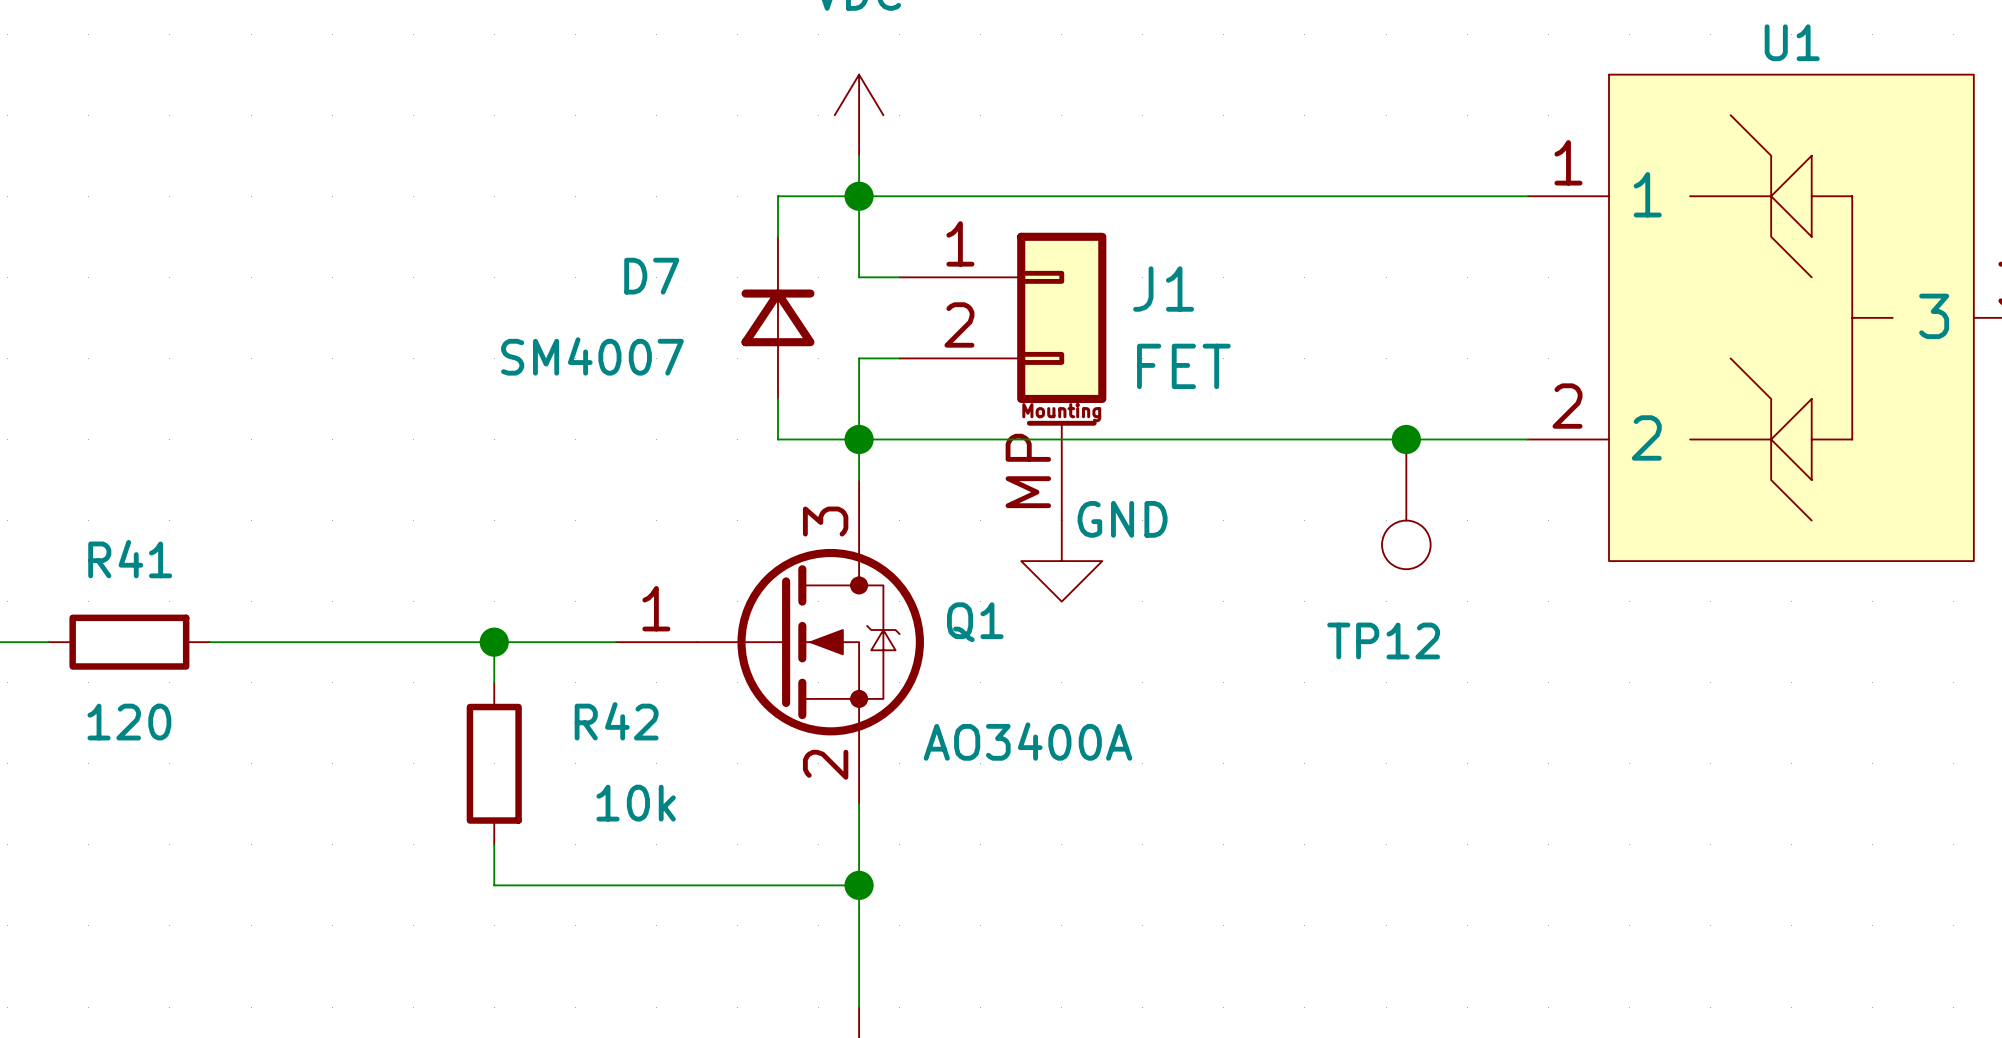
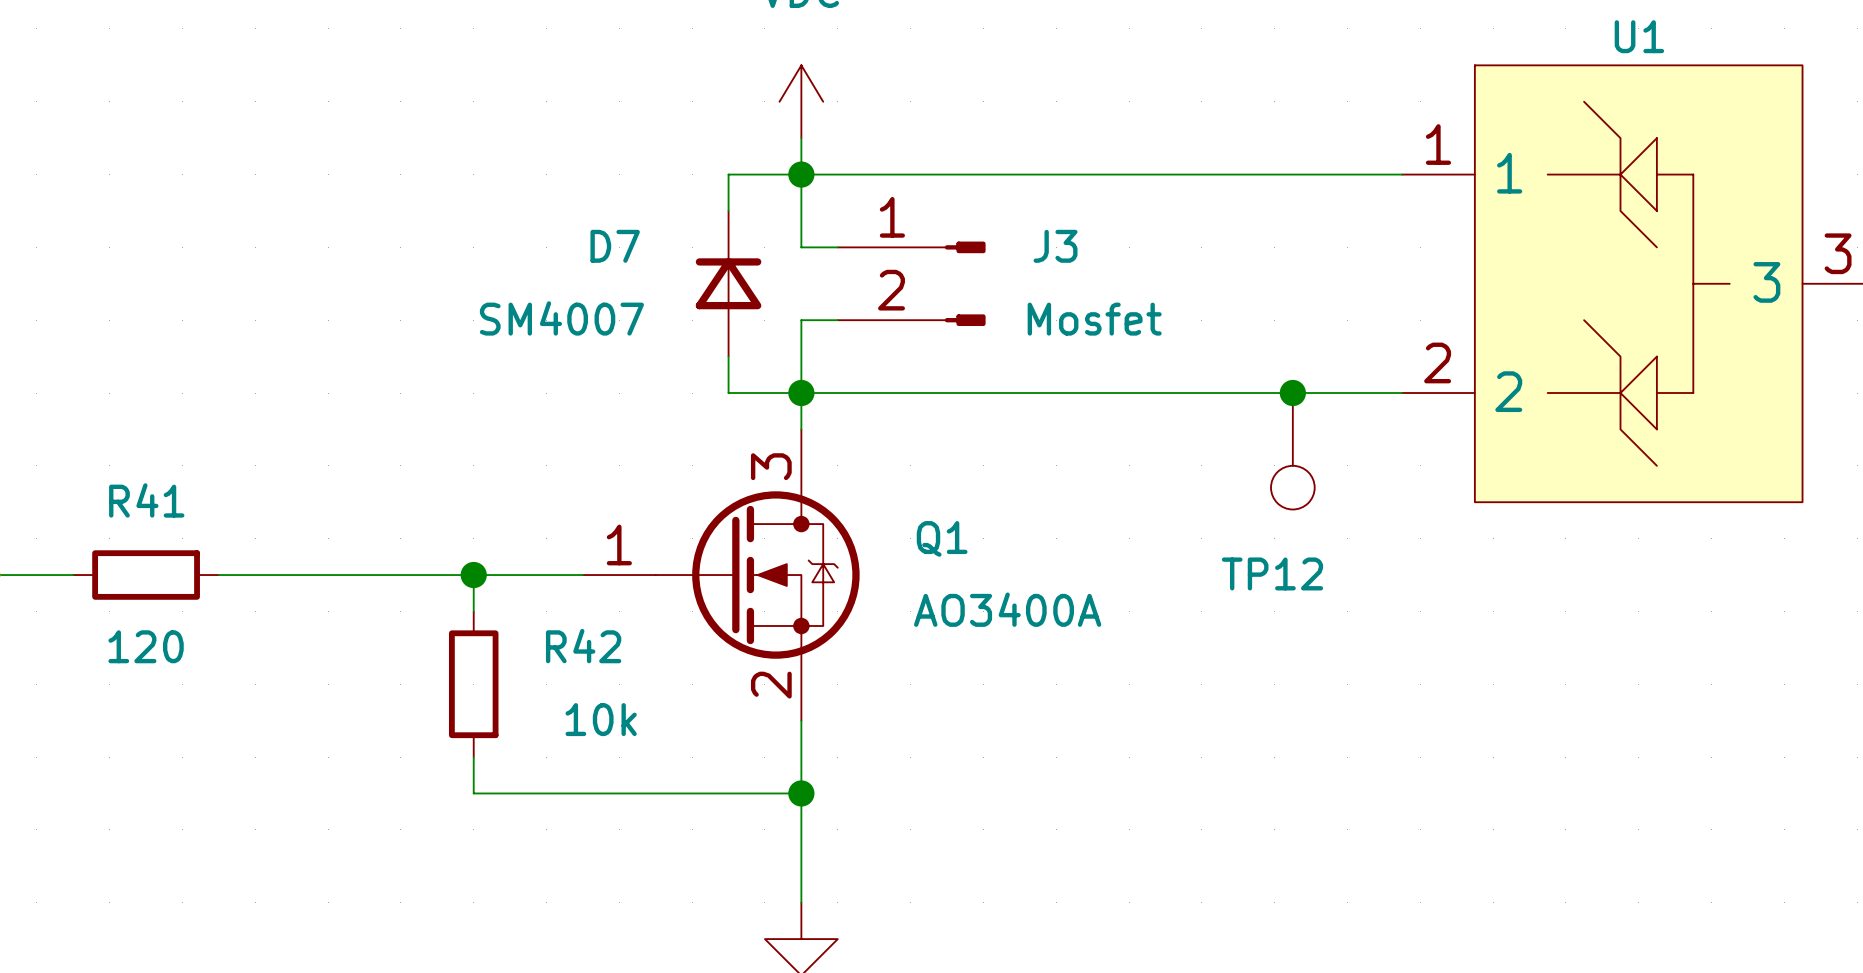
J3: none -> Mosfet (911, 283)
J1: FET (1002, 376) -> none
power symbol: GND (1061, 561) -> none
Q1 name position: Q1 (975, 622) -> Q1 (942, 538)
Q1 value position: AO3400A (1027, 741) -> AO3400A (1007, 609)

